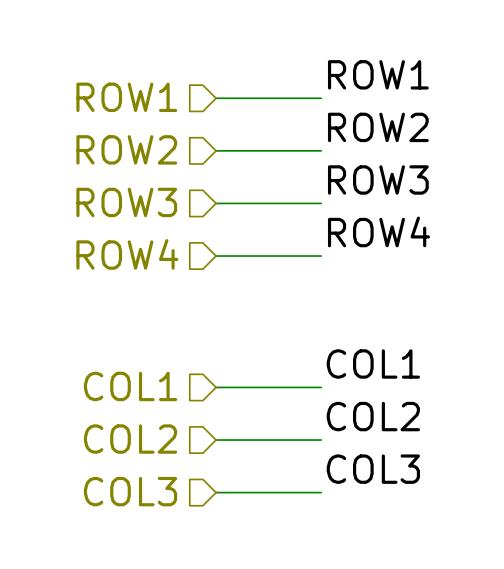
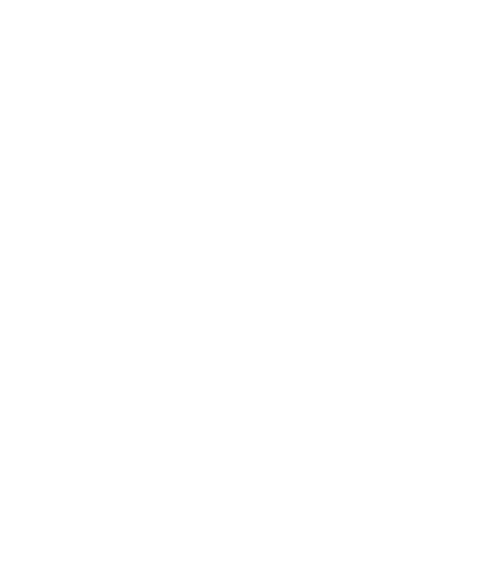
label: ROW1 (378, 74) -> none
hierarchical label: ROW1 (126, 97) -> none
wire: (216, 98) (321, 98) -> none
label: ROW2 (378, 127) -> none
hierarchical label: ROW2 (126, 149) -> none
wire: (216, 150) (321, 150) -> none
label: ROW3 (378, 179) -> none
hierarchical label: ROW3 (126, 202) -> none
wire: (216, 203) (321, 203) -> none
label: ROW4 (378, 231) -> none
hierarchical label: ROW4 (127, 254) -> none
wire: (216, 256) (321, 256) -> none
label: COL1 (373, 363) -> none
hierarchical label: COL1 (130, 386) -> none
wire: (216, 387) (321, 387) -> none
label: COL2 (373, 416) -> none
hierarchical label: COL2 (130, 439) -> none
wire: (216, 440) (321, 440) -> none
label: COL3 (373, 469) -> none
hierarchical label: COL3 (130, 491) -> none
wire: (216, 492) (321, 492) -> none

